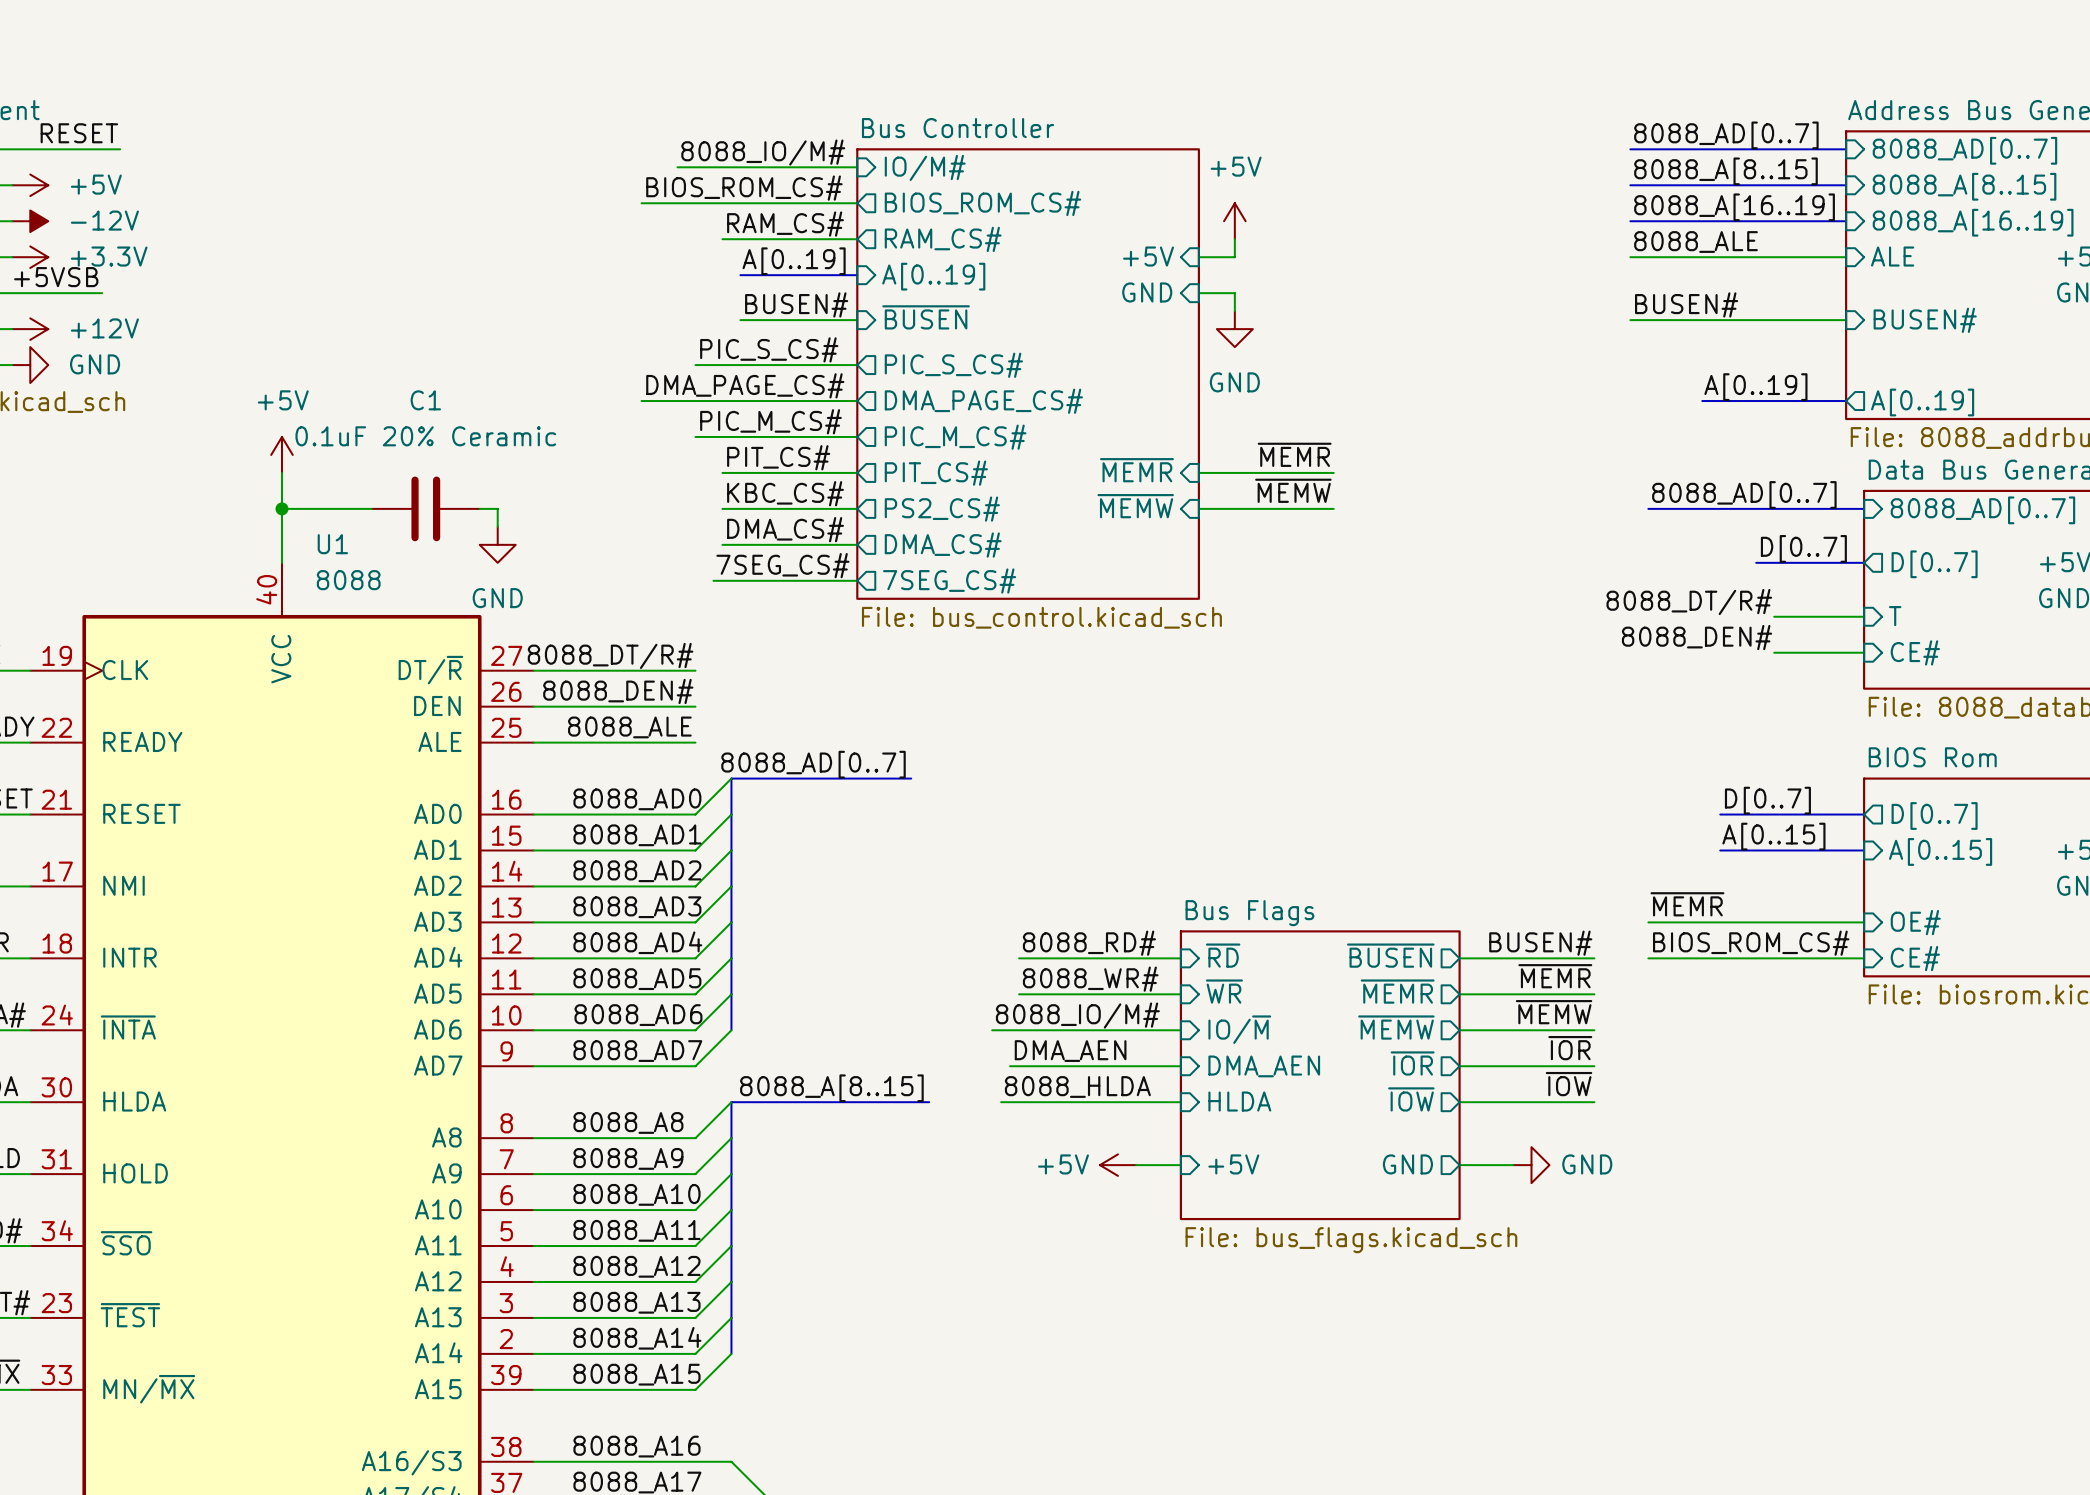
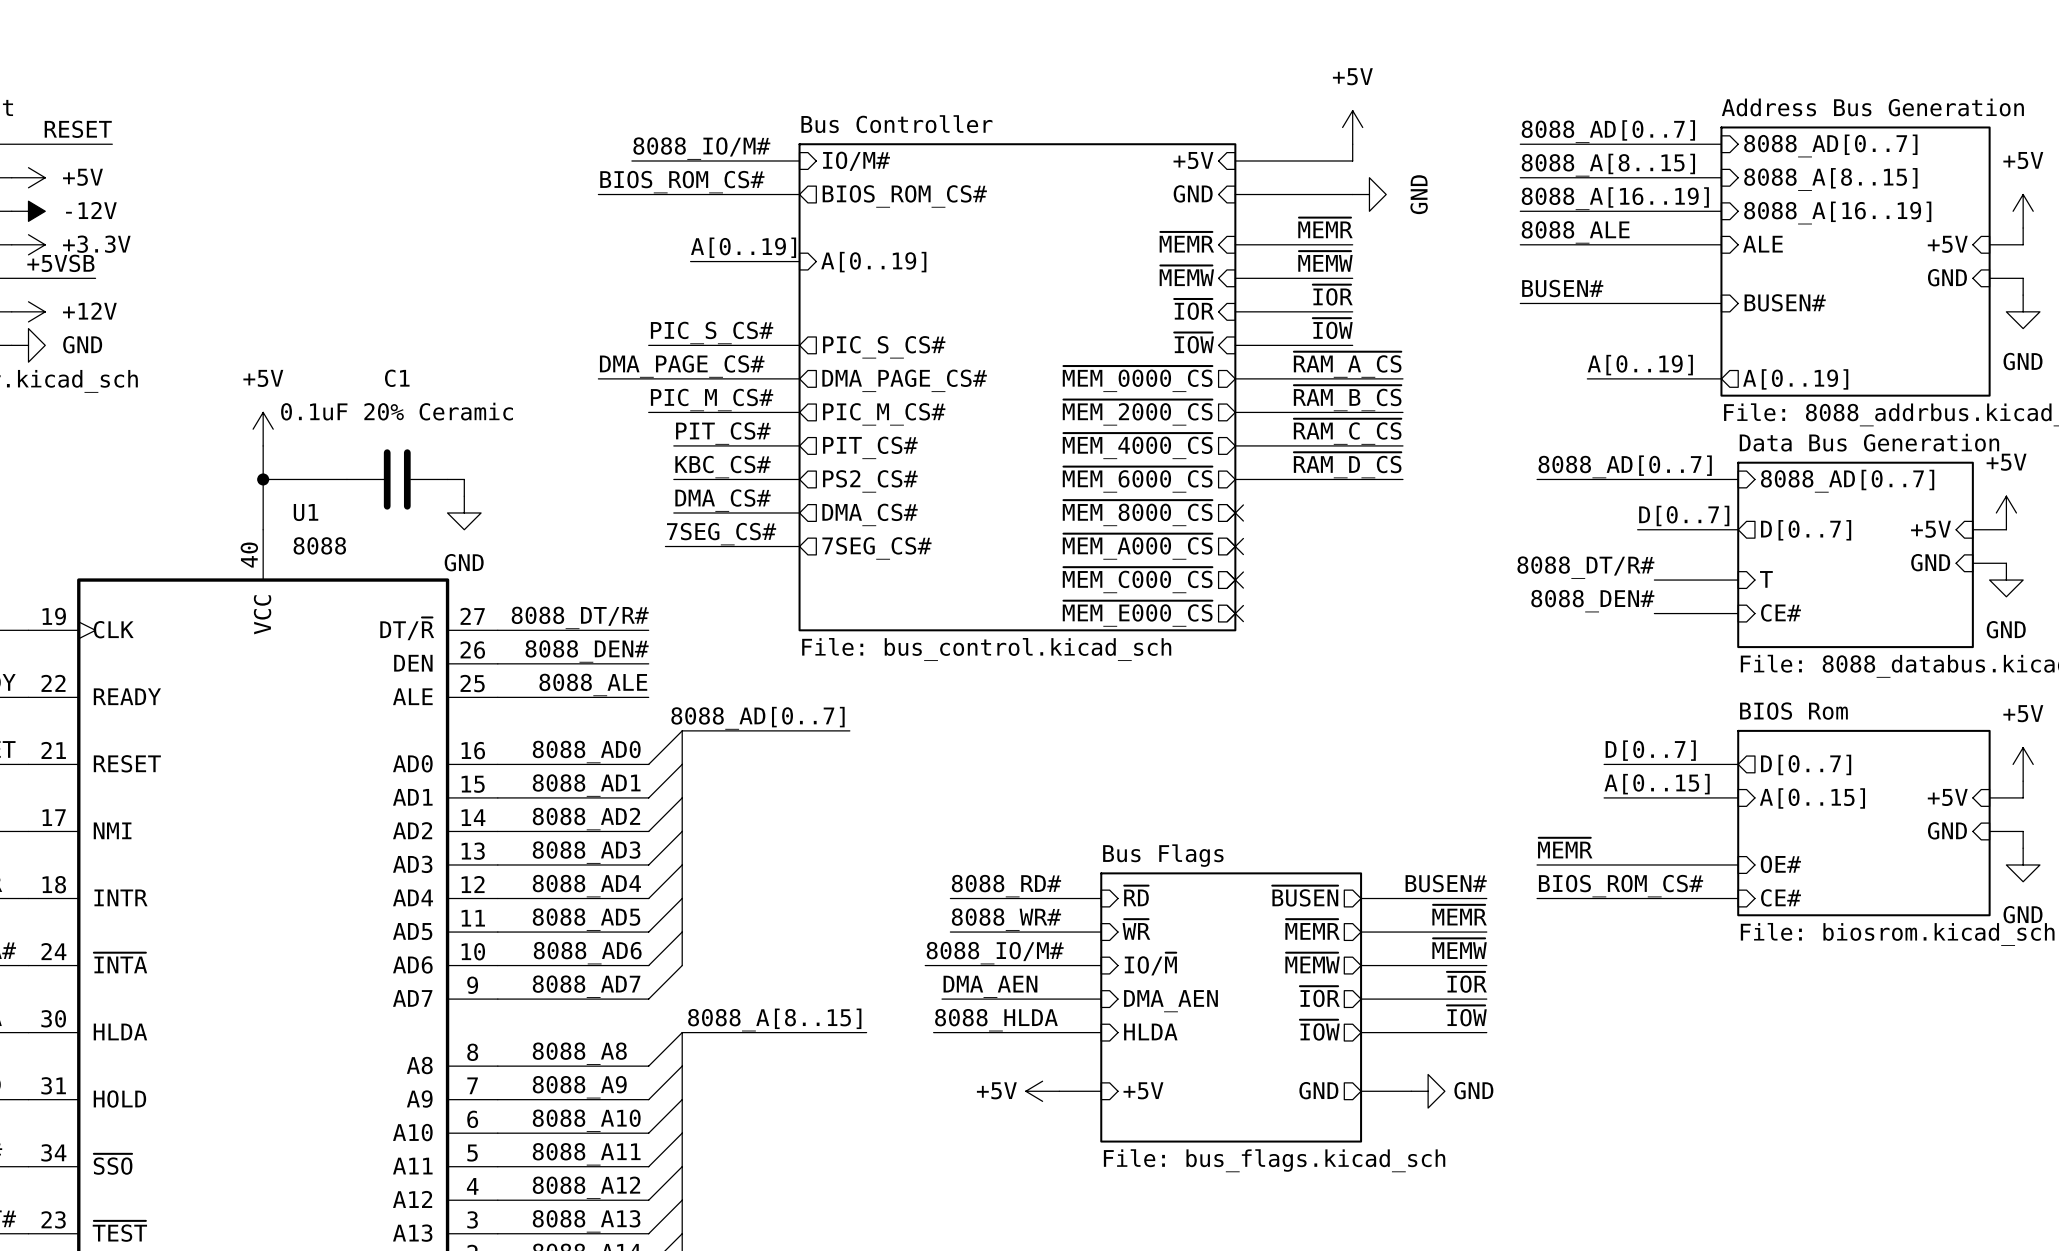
wire: none -> (1352, 144) (1352, 160) (1235, 160)
wire: none -> (1235, 194) (1352, 194)
power symbol position: +5V (1234, 221) -> +5V (1352, 127)
label: RAM_CS# (785, 224) -> none
wire: (722, 239) (857, 239) -> none
sheet pin: RAM_CS# (943, 239) -> none
wire: (1234, 239) (1234, 257) (1198, 257) -> none
sheet pin position: +5V (1148, 256) -> +5V (1193, 160)
wire: none -> (1235, 244) (1352, 244)
sheet pin position: GND (1147, 292) -> GND (1193, 193)
wire: (1198, 293) (1234, 293) (1234, 311) -> none
wire: none -> (1235, 278) (1352, 278)
label: BUSEN# (796, 304) -> none
label: none -> ~{IOR} (1332, 295)
sheet pin: ~{BUSEN} (926, 317) -> none
wire: (740, 320) (857, 320) -> none
sheet pin: none -> ~{IOR} (1194, 309)
power symbol rotation: 0° (1234, 329) -> 90° counterclockwise (1369, 194)
power symbol position: GND (1234, 329) -> GND (1369, 194)
label: none -> ~{IOW} (1332, 328)
sheet pin: none -> ~{IOW} (1194, 342)
sheet Bus Controller: File: bus_control.kicad_sch (1028, 374) -> none
label: none -> ~{RAM_A_CS} (1347, 364)
sheet pin: none -> ~{MEM_0000_CS} (1137, 379)
wire: none -> (1235, 378) (1402, 378)
sheet Bus Controller: none -> File: bus_control.kicad_sch (1017, 387)
label: none -> ~{RAM_B_CS} (1347, 398)
sheet pin: none -> ~{MEM_2000_CS} (1137, 412)
wire: none -> (1235, 412) (1402, 412)
label position: ~{MEMR} (1294, 454) -> ~{MEMR} (1325, 227)
label: none -> ~{RAM_C_CS} (1347, 431)
sheet pin position: ~{MEMR} (1136, 470) -> ~{MEMR} (1186, 242)
sheet pin: none -> ~{MEM_4000_CS} (1137, 446)
wire: (1198, 472) (1324, 472) -> (1235, 311) (1352, 311)
wire: none -> (1243, 445) (1402, 445)
label position: ~{MEMW} (1293, 490) -> ~{MEMW} (1325, 261)
label: none -> ~{RAM_D_CS} (1347, 465)
sheet pin position: ~{MEMW} (1135, 506) -> ~{MEMW} (1186, 275)
sheet pin: none -> ~{MEM_6000_CS} (1137, 479)
wire: (1198, 508) (1324, 508) -> (1235, 345) (1352, 345)
wire: none -> (1243, 479) (1402, 479)
sheet pin: none -> ~{MEM_8000_CS} (1137, 513)
no-connect mark: none -> (1235, 512)
sheet pin: none -> ~{MEM_A000_CS} (1137, 546)
no-connect mark: none -> (1235, 546)
sheet pin: none -> ~{MEM_C000_CS} (1137, 580)
no-connect mark: none -> (1235, 580)
sheet pin: none -> ~{MEM_E000_CS} (1137, 613)
no-connect mark: none -> (1235, 613)

